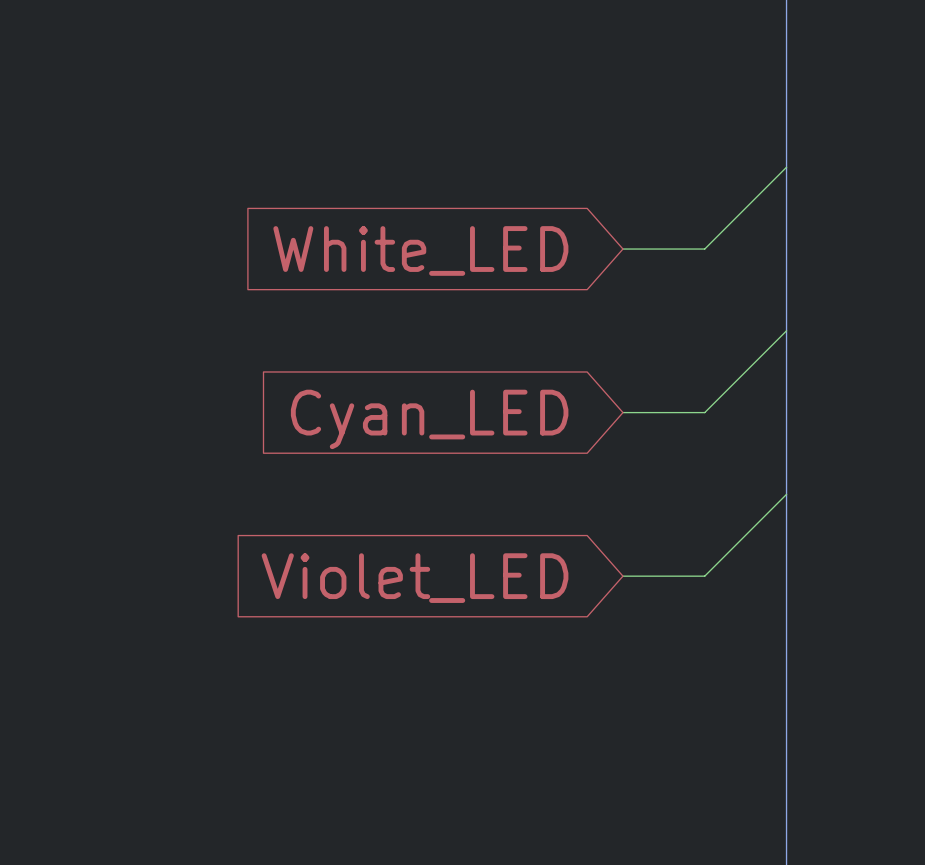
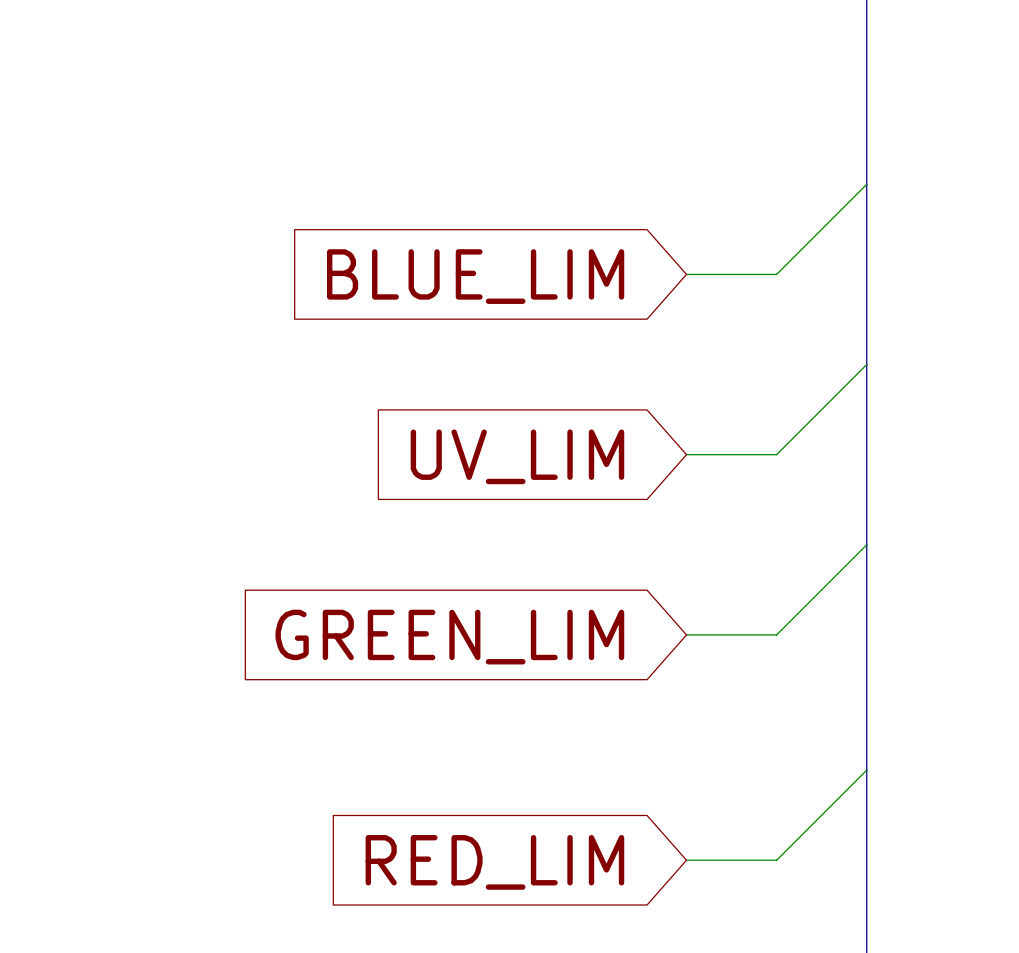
global label: White_LED (420, 250) -> BLUE_LIM (475, 276)
global label: Cyan_LED (429, 419) -> UV_LIM (517, 456)
global label: Violet_LED (415, 578) -> GREEN_LIM (449, 637)
wire: none -> (866, 770) (776, 860) (686, 860)
global label: none -> RED_LIM (494, 862)

